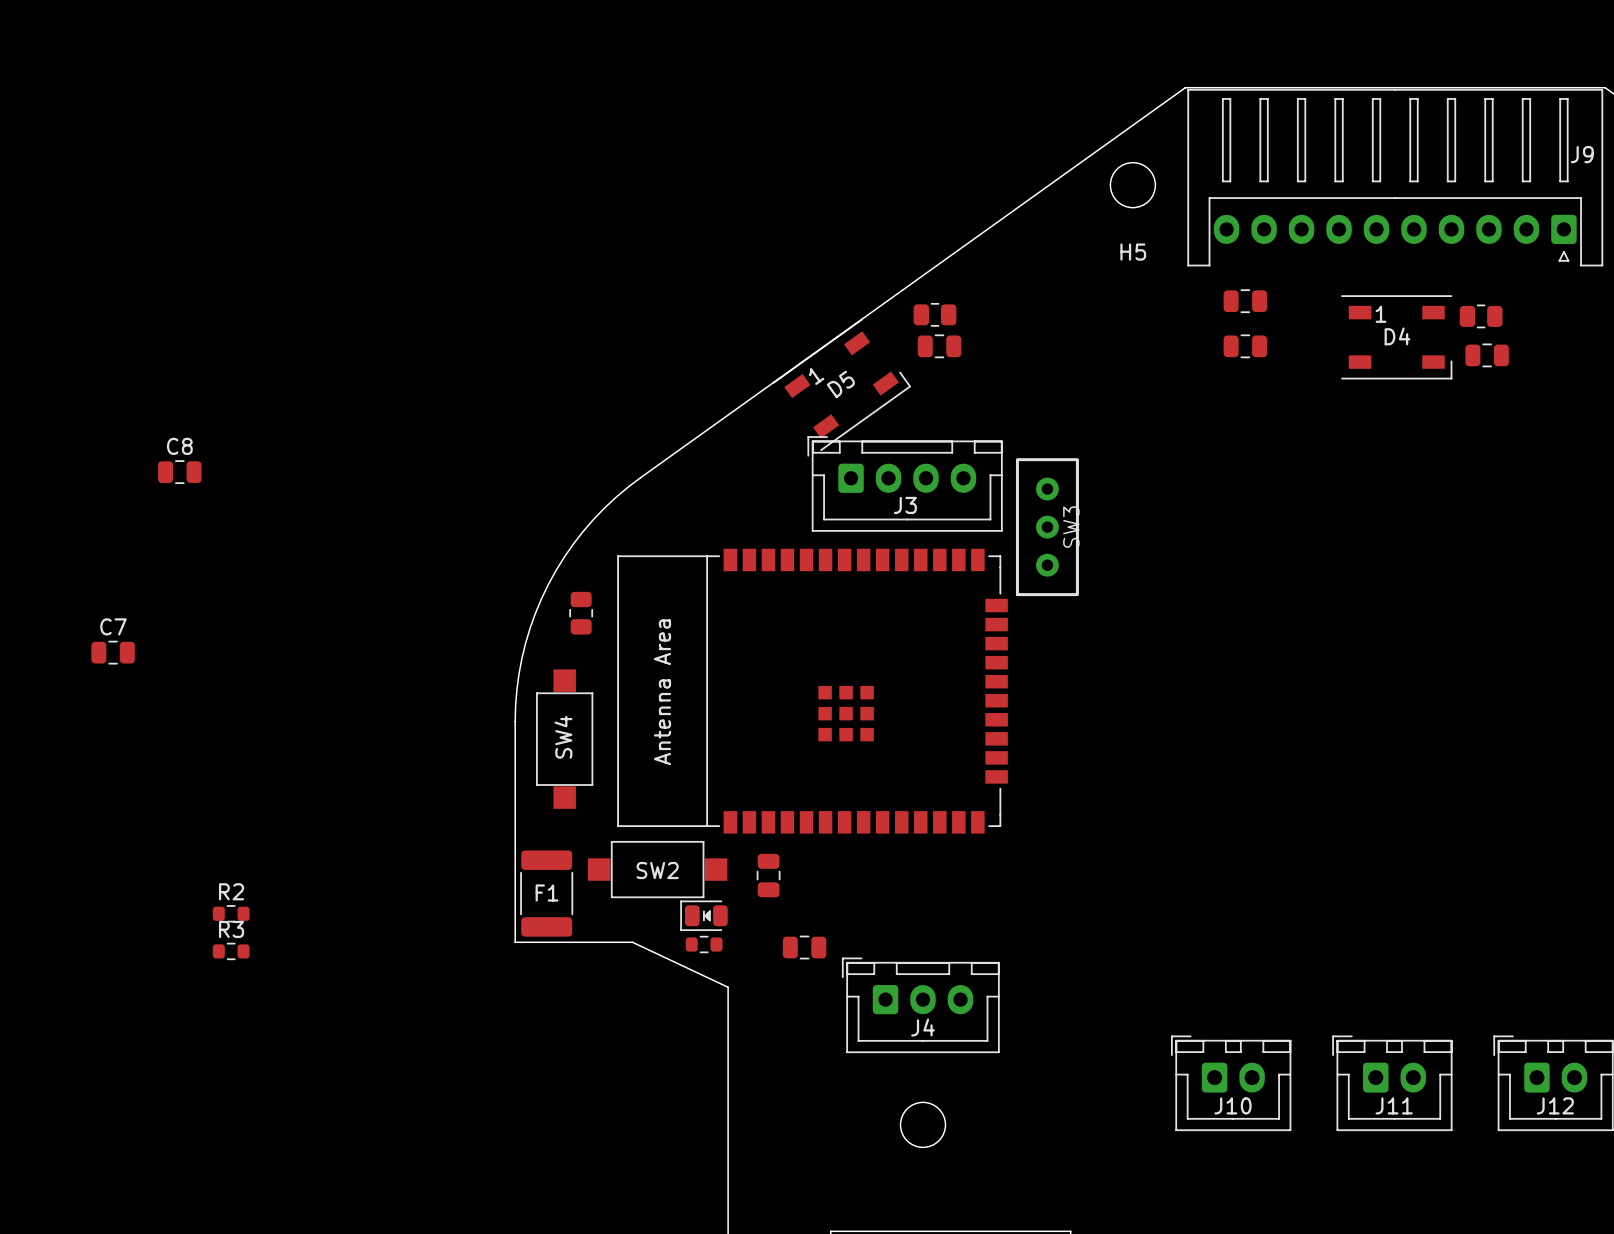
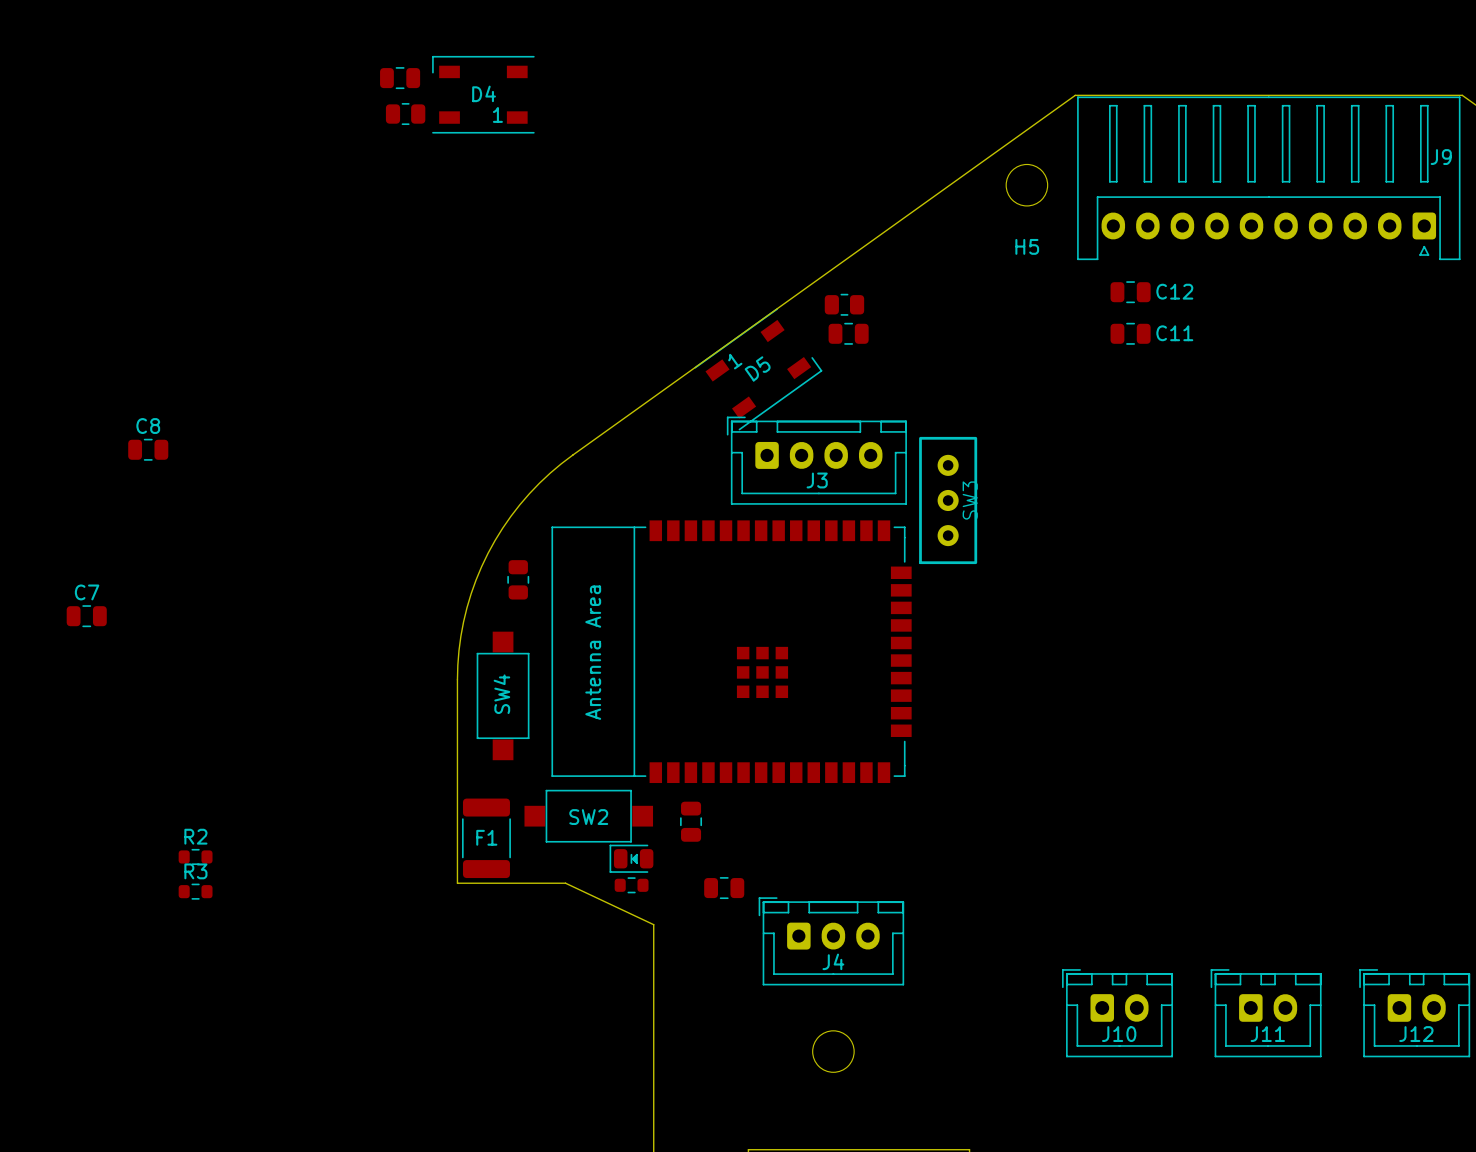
part: none -> (400, 78)
part: none -> (405, 114)
C12 name: none -> C12 (1174, 291)
part: (1481, 316) -> none
D4 rotation: 0° (1396, 337) -> 180° (483, 94)
D4 position: (1396, 337) -> (483, 94)
C11 name: none -> C11 (1174, 333)
part: (1487, 355) -> none

